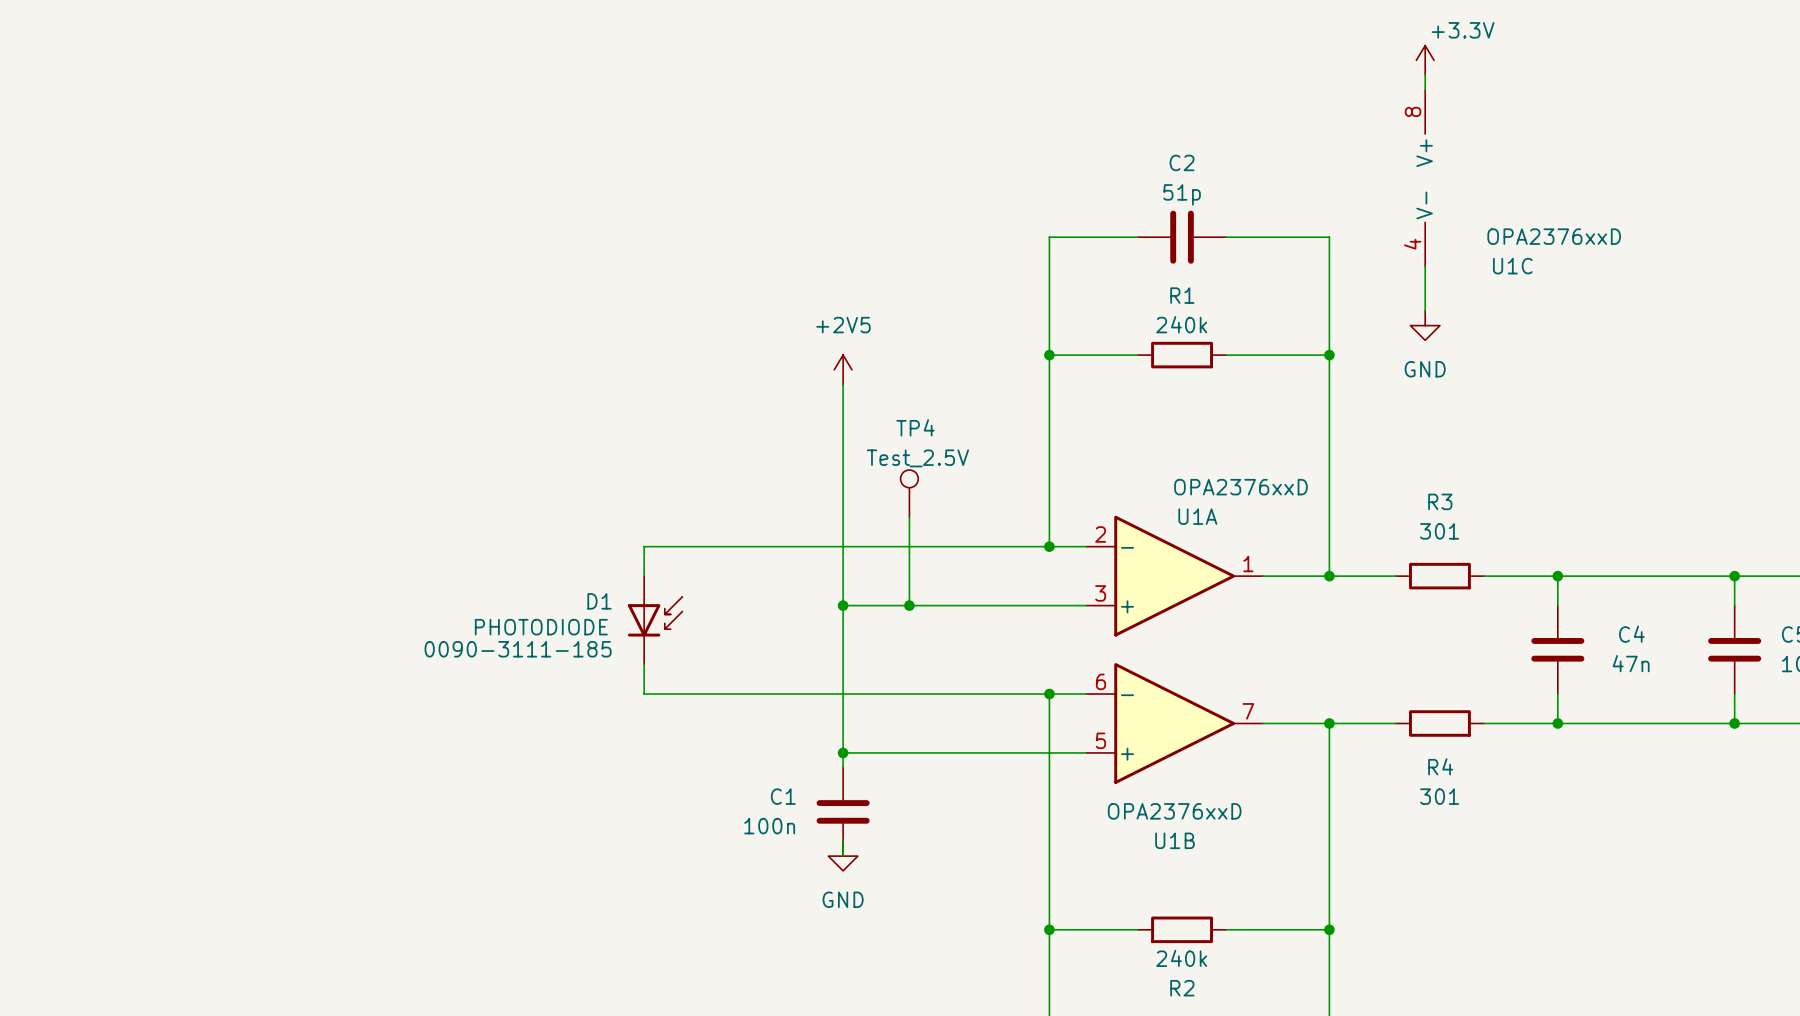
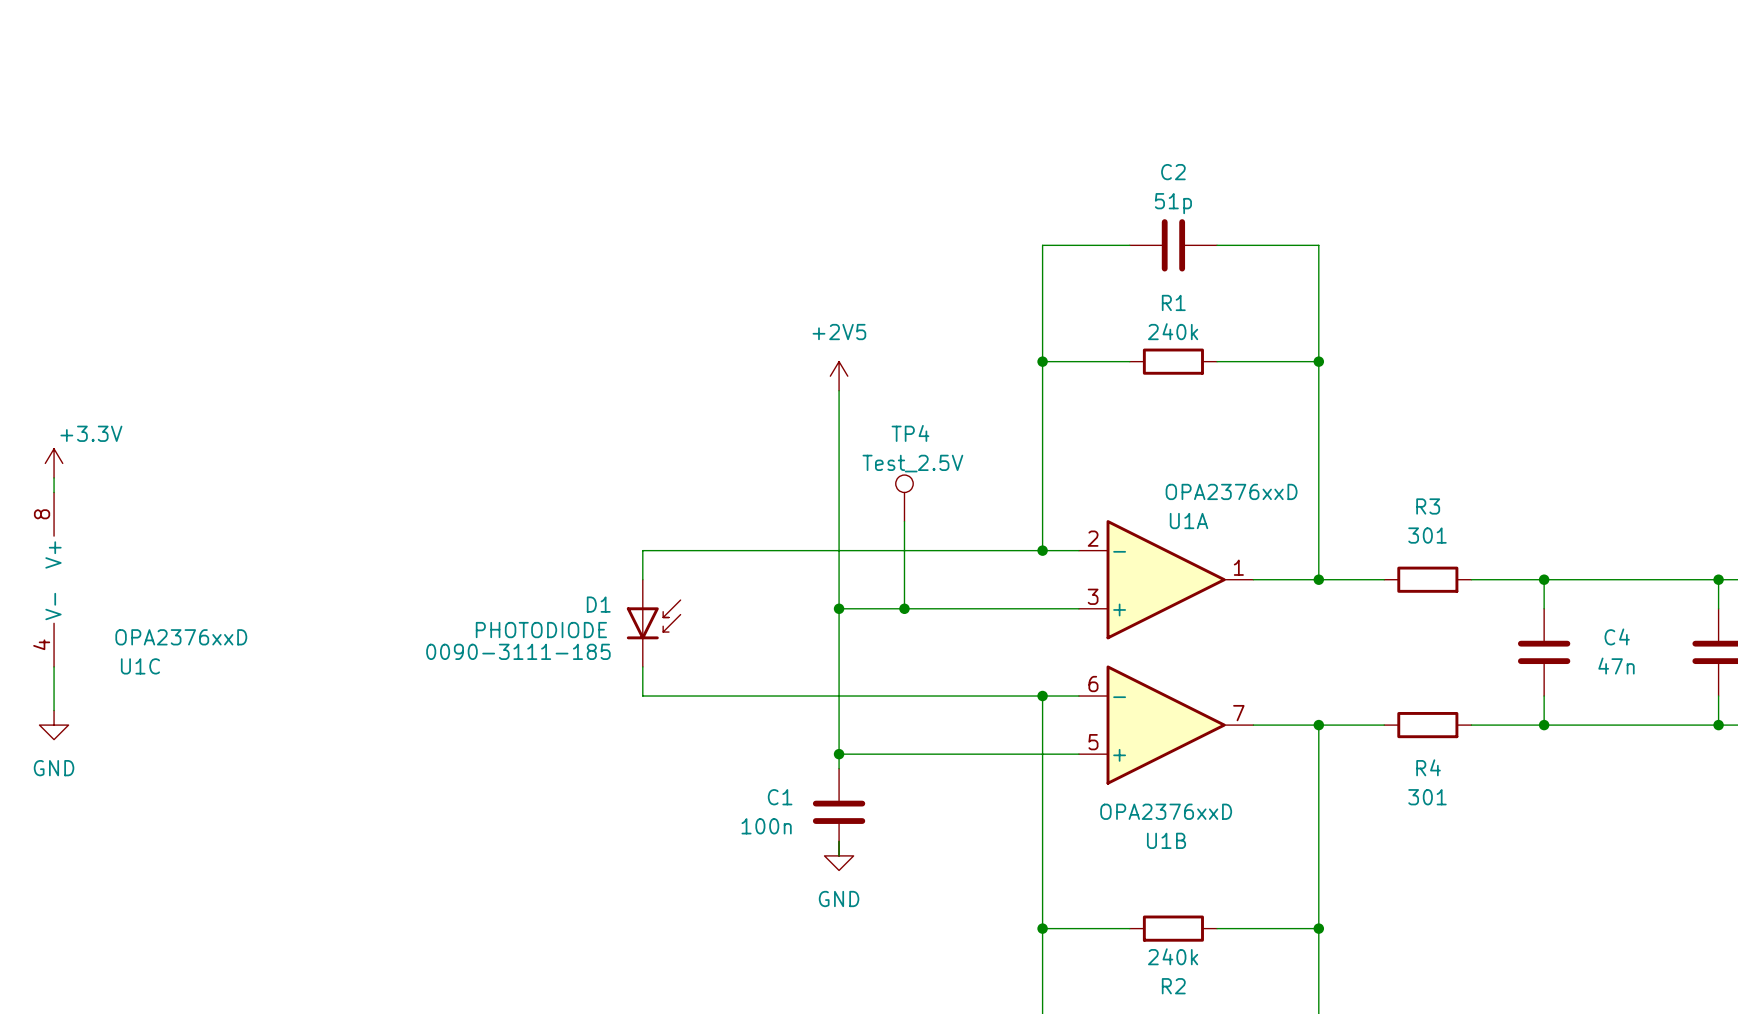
power symbol: +3.3V (1425, 60) -> none
wire: (1425, 75) (1425, 89) -> none
U1C position: (1425, 178) -> (54, 579)
wire: (1425, 266) (1425, 310) -> none
power symbol: GND (1425, 325) -> none
power symbol: none -> +3.3V (54, 463)
wire: none -> (54, 477) (54, 492)
wire: none -> (54, 666) (54, 710)
power symbol: none -> GND (54, 725)

